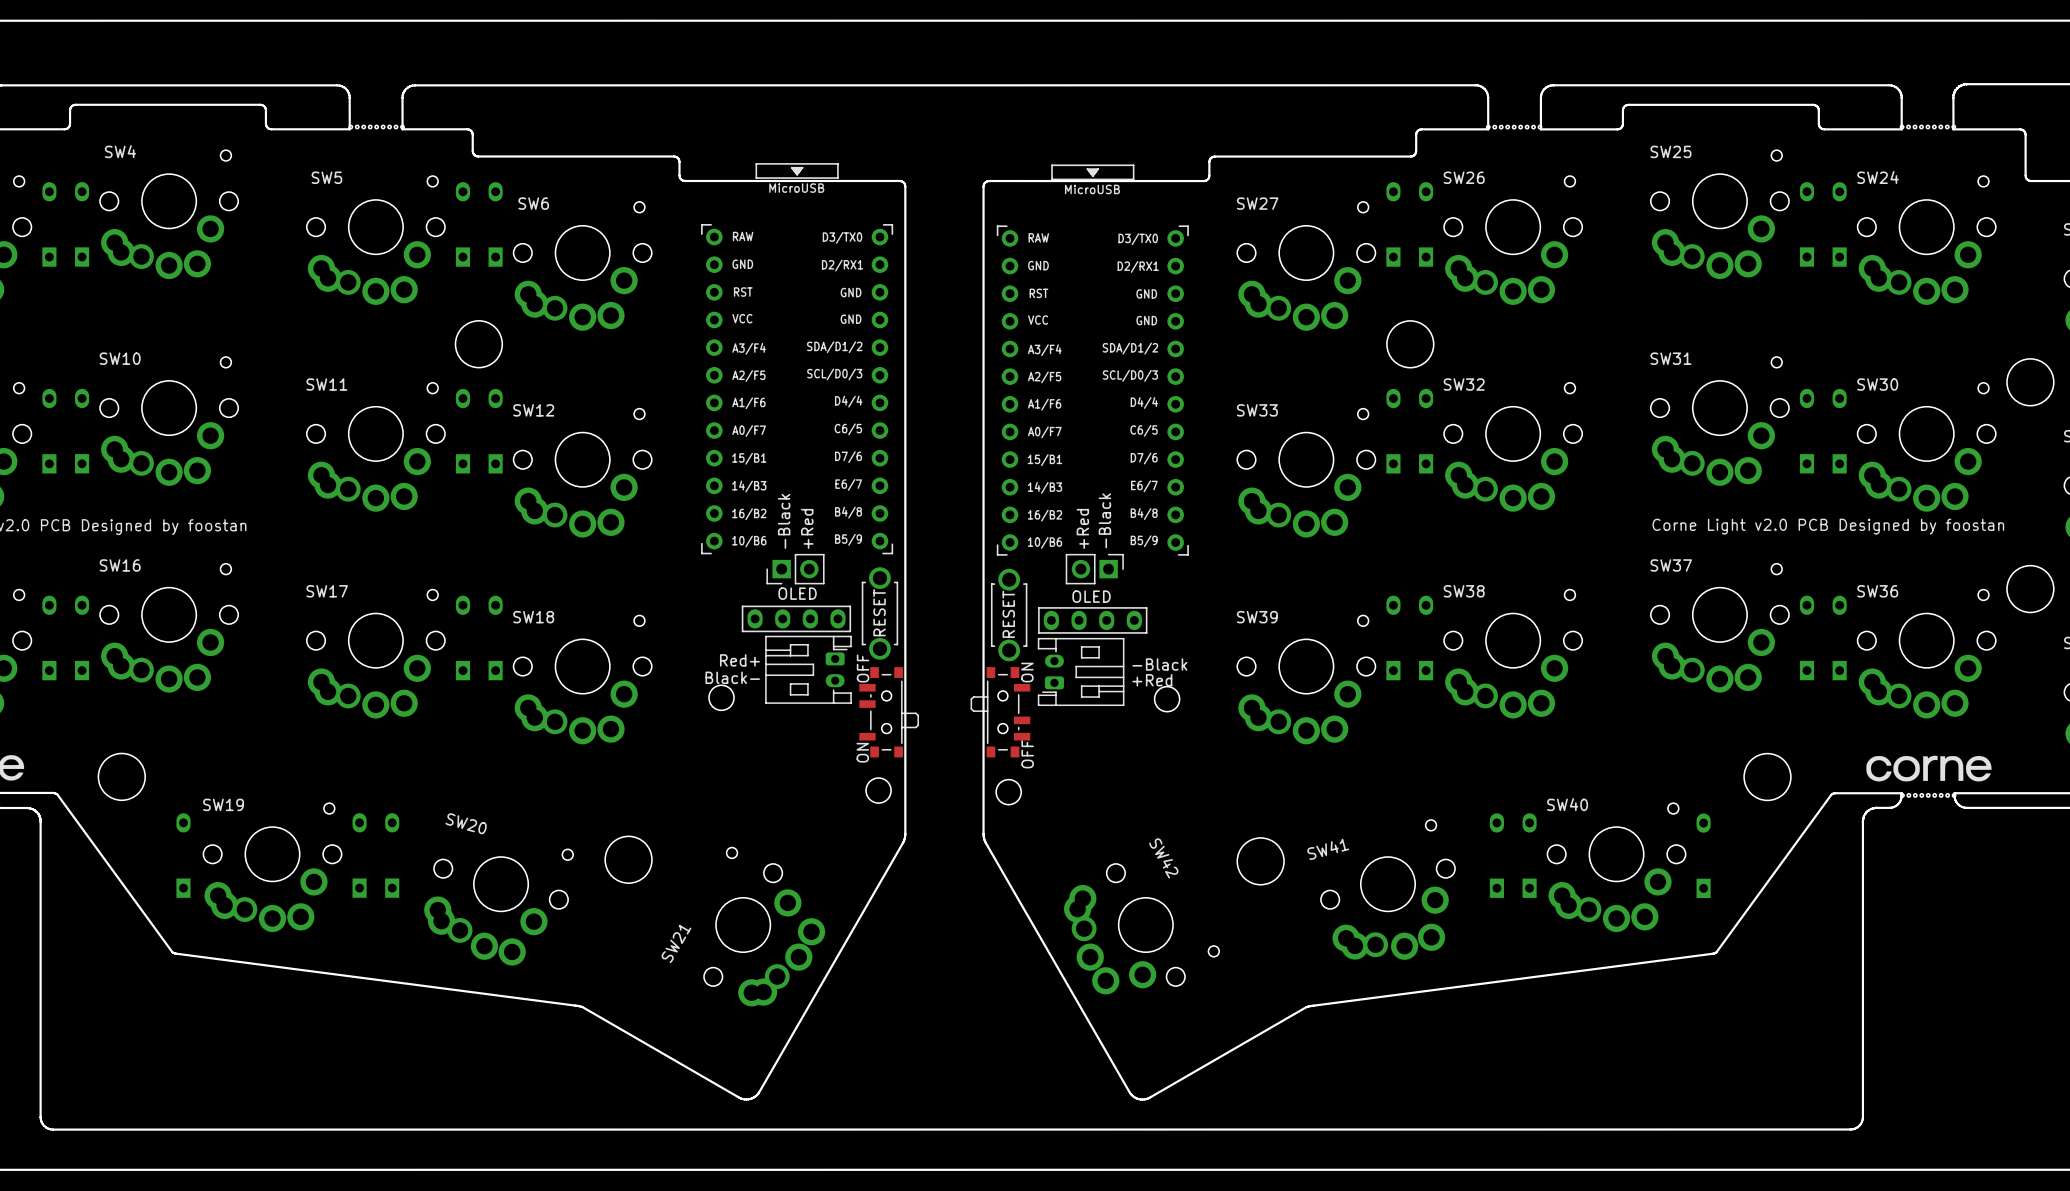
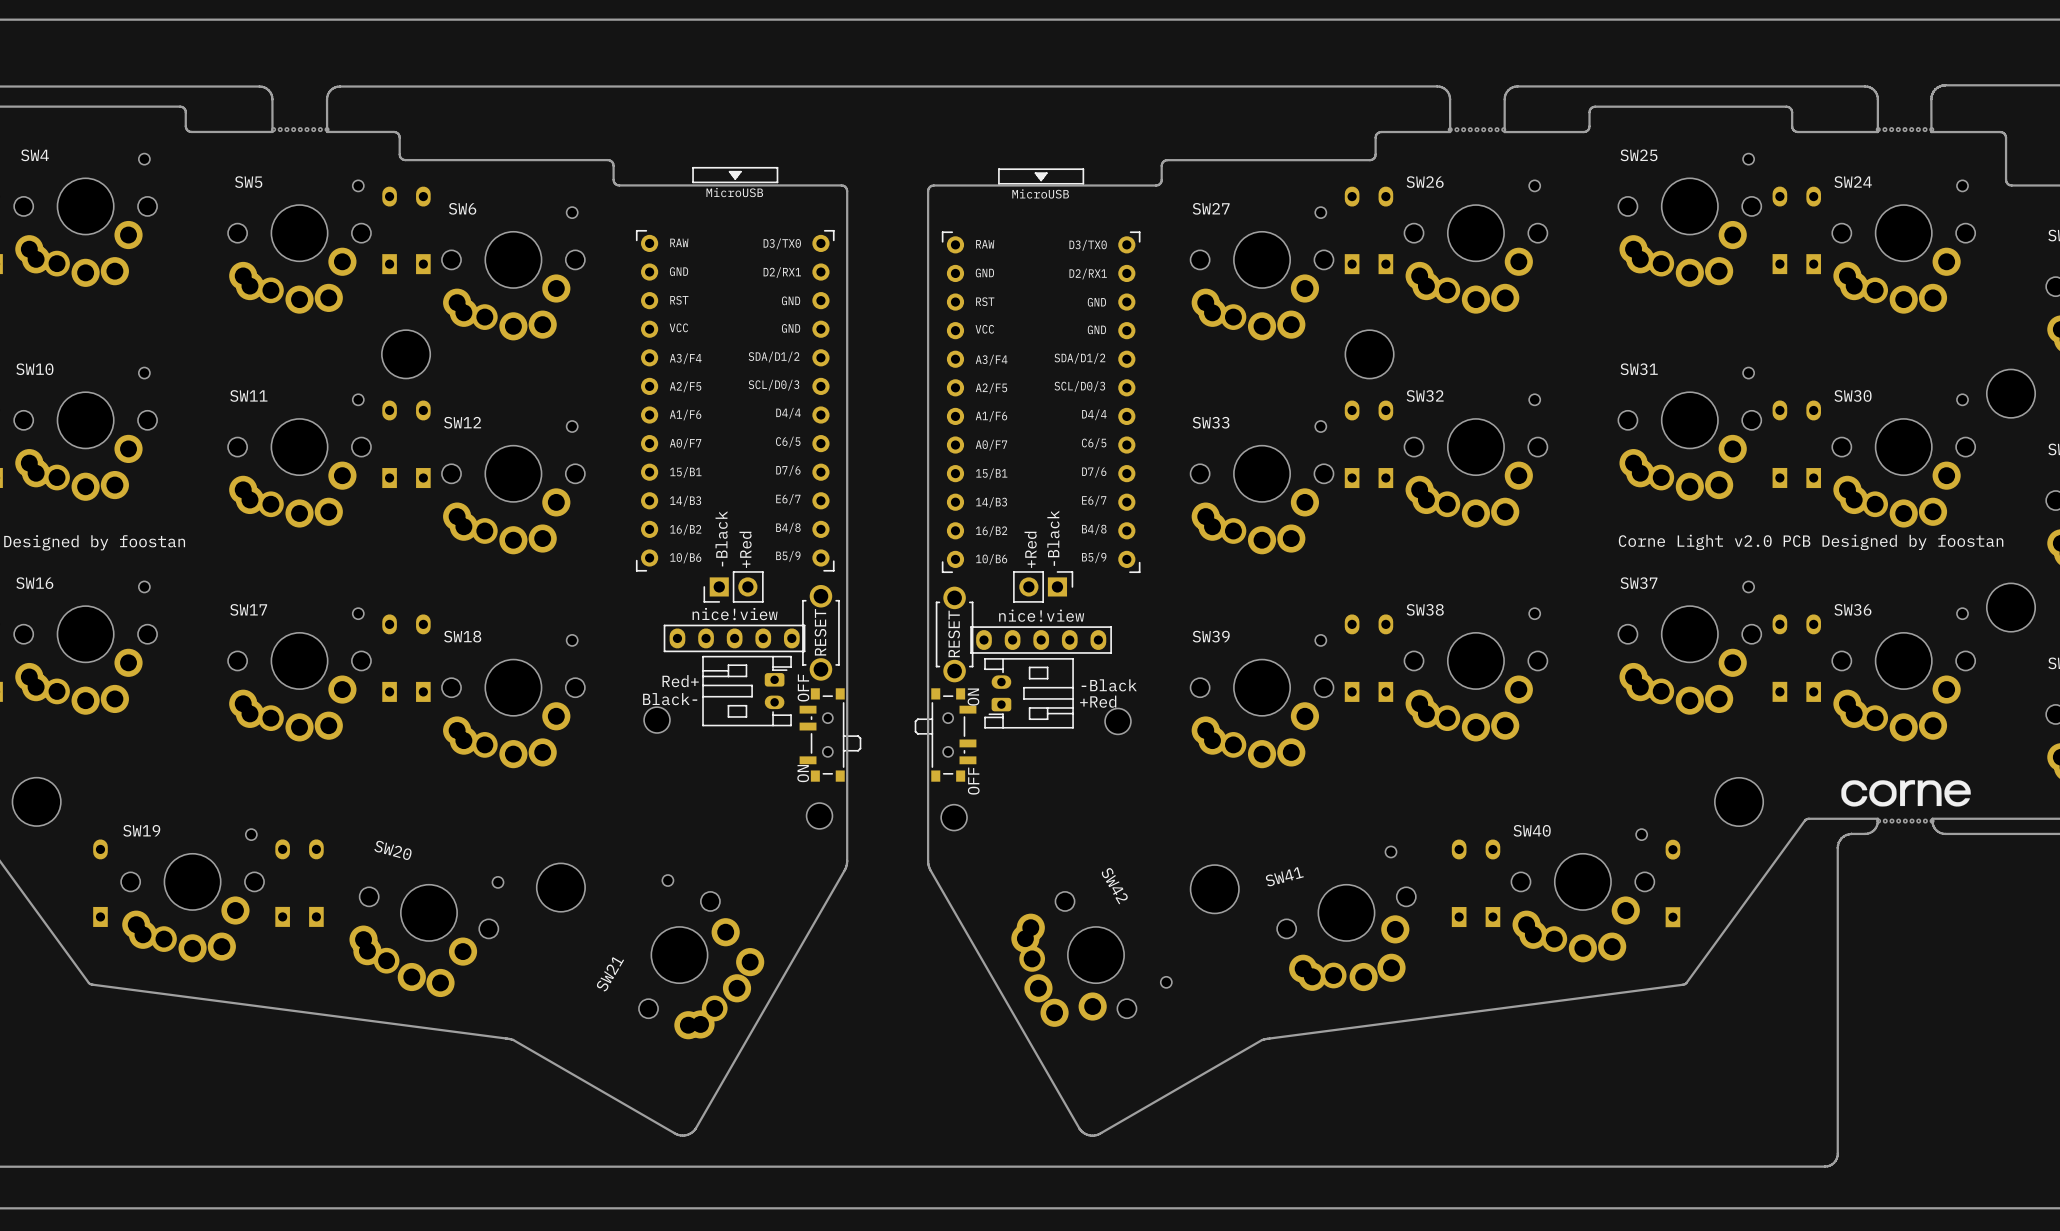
part footprint: [741, 605, 852, 633] -> [663, 624, 806, 653]
part footprint: [1038, 607, 1148, 634] -> [970, 626, 1112, 654]

